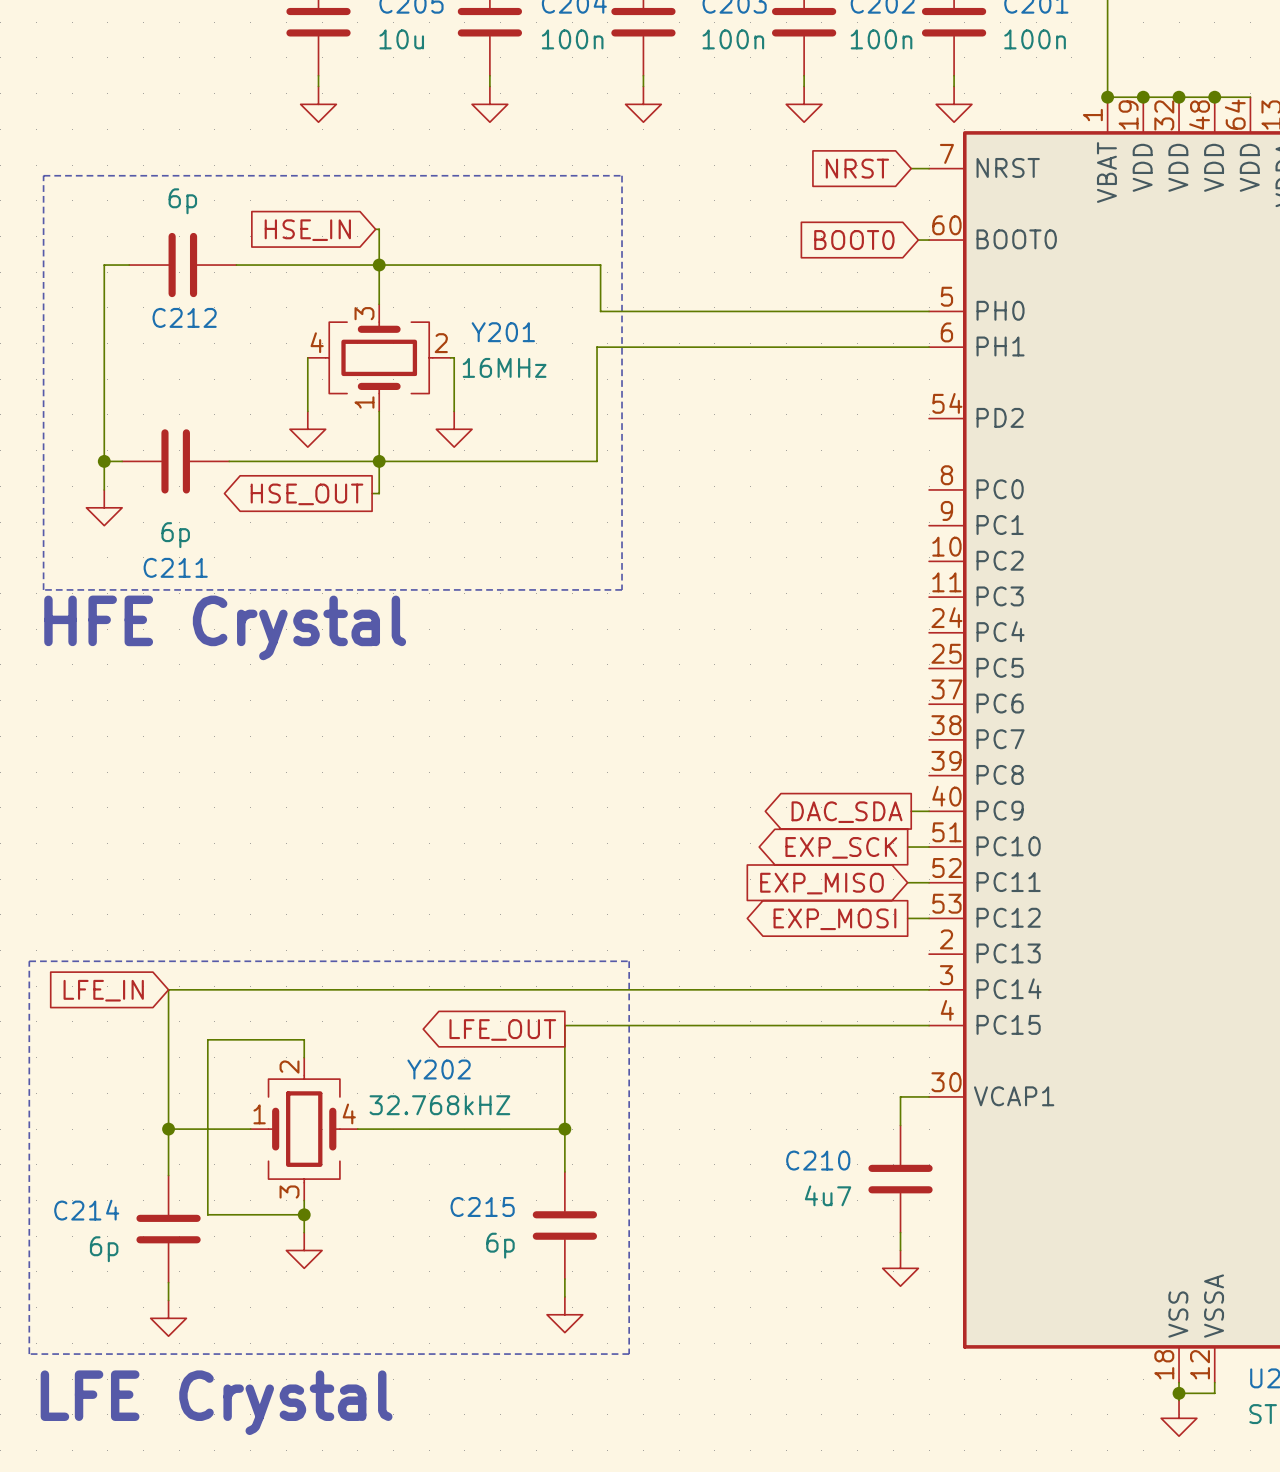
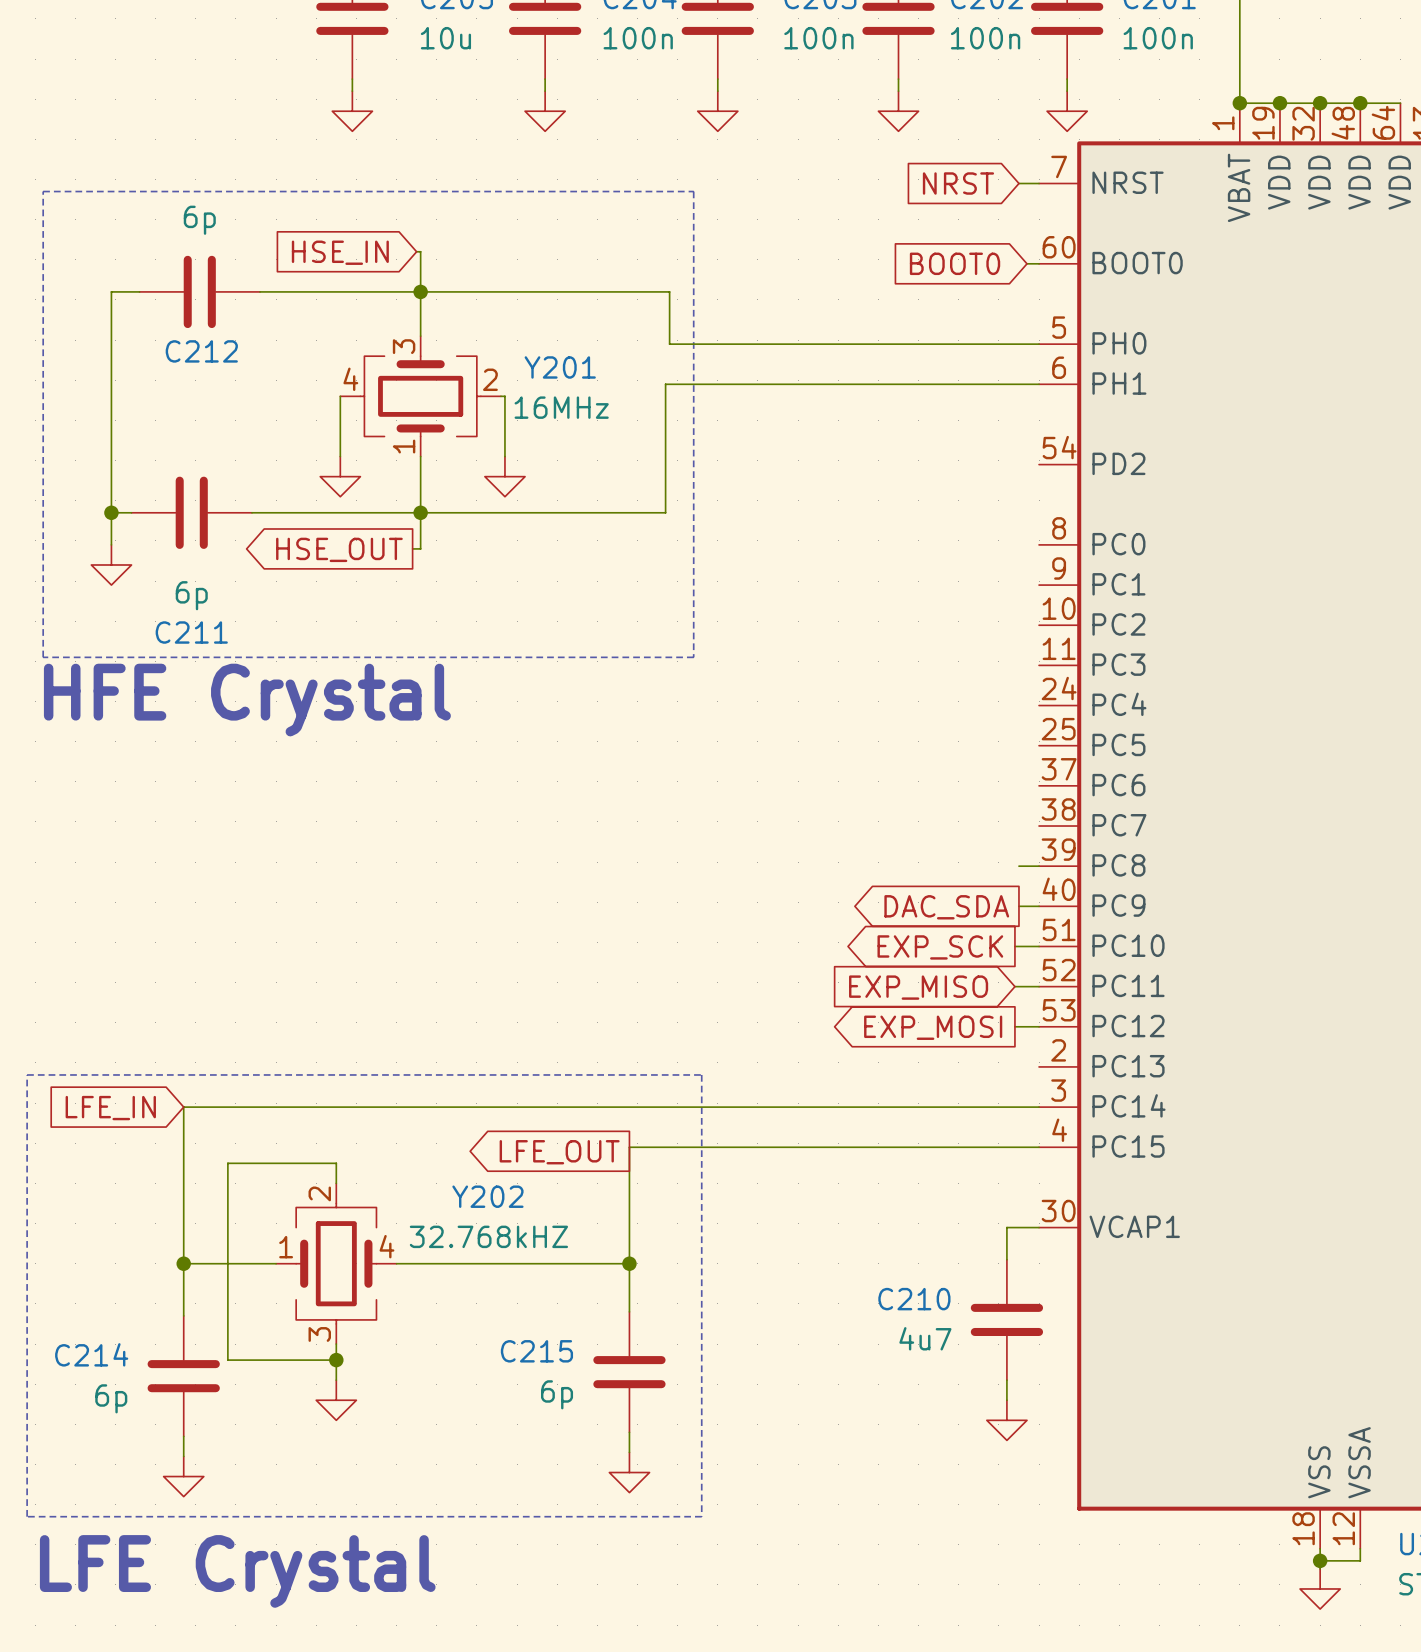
wire: none -> (1018, 866) (1039, 866)

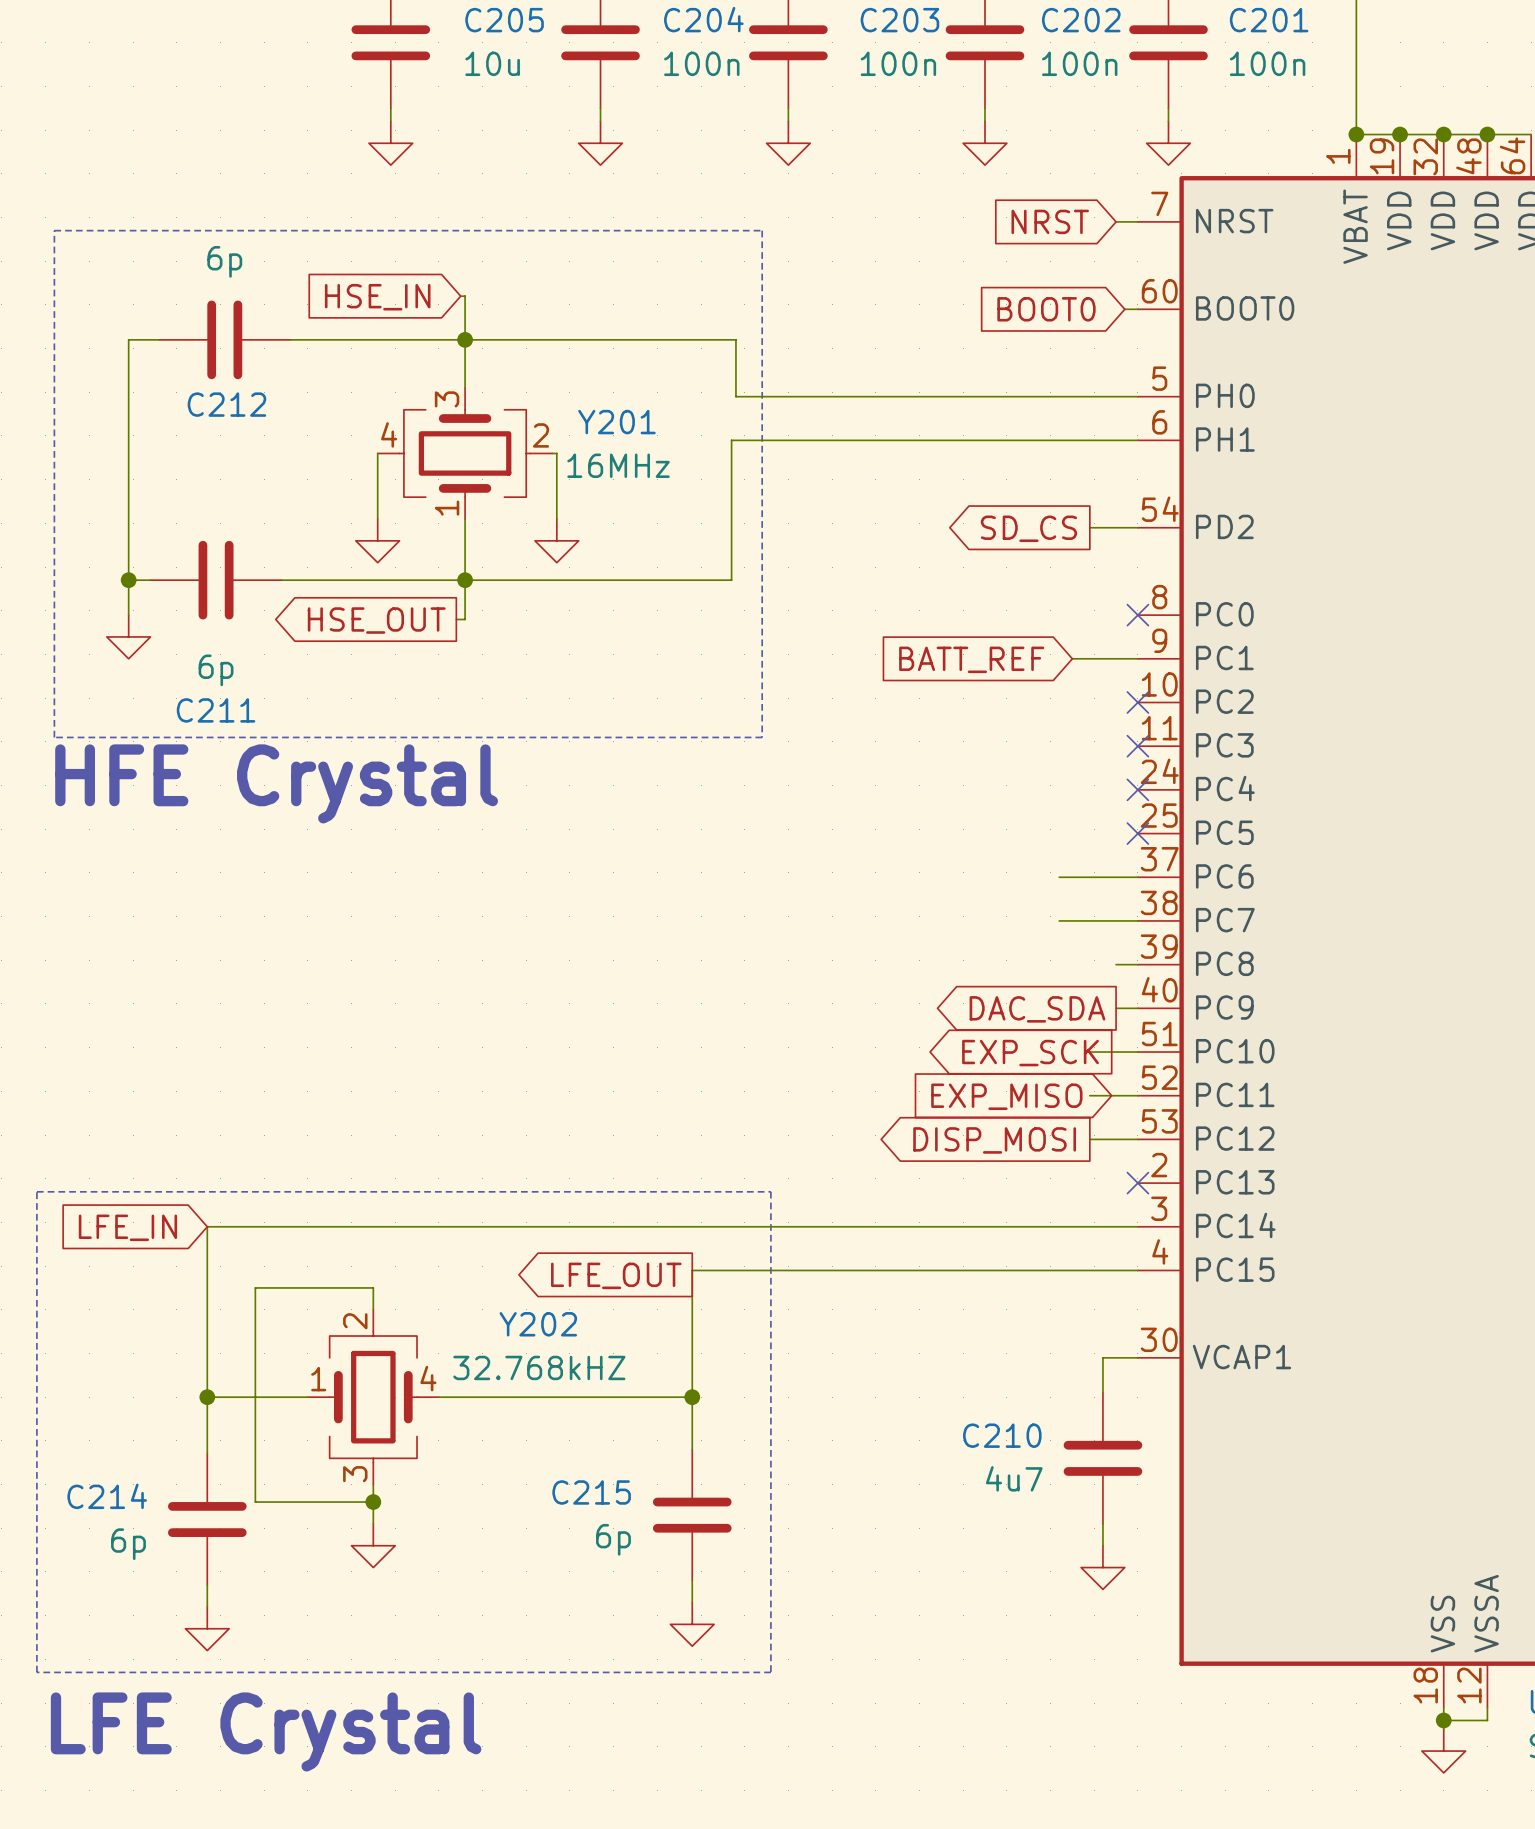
wire: none -> (1089, 527) (1137, 527)
global label: none -> SD_CS (1028, 528)
no-connect mark: none -> (1137, 615)
wire: none -> (1072, 658) (1137, 658)
global label: none -> BATT_REF (971, 659)
no-connect mark: none -> (1137, 702)
no-connect mark: none -> (1137, 746)
no-connect mark: none -> (1137, 789)
no-connect mark: none -> (1137, 833)
wire: none -> (1059, 877) (1137, 877)
wire: none -> (1059, 920) (1137, 920)
wire: none -> (1089, 1052) (1111, 1052)
wire: none -> (1089, 1095) (1111, 1095)
wire: none -> (1089, 1139) (1111, 1139)
global label: EXP_MOSI (933, 1027) -> DISP_MOSI (994, 1140)
no-connect mark: none -> (1137, 1183)

